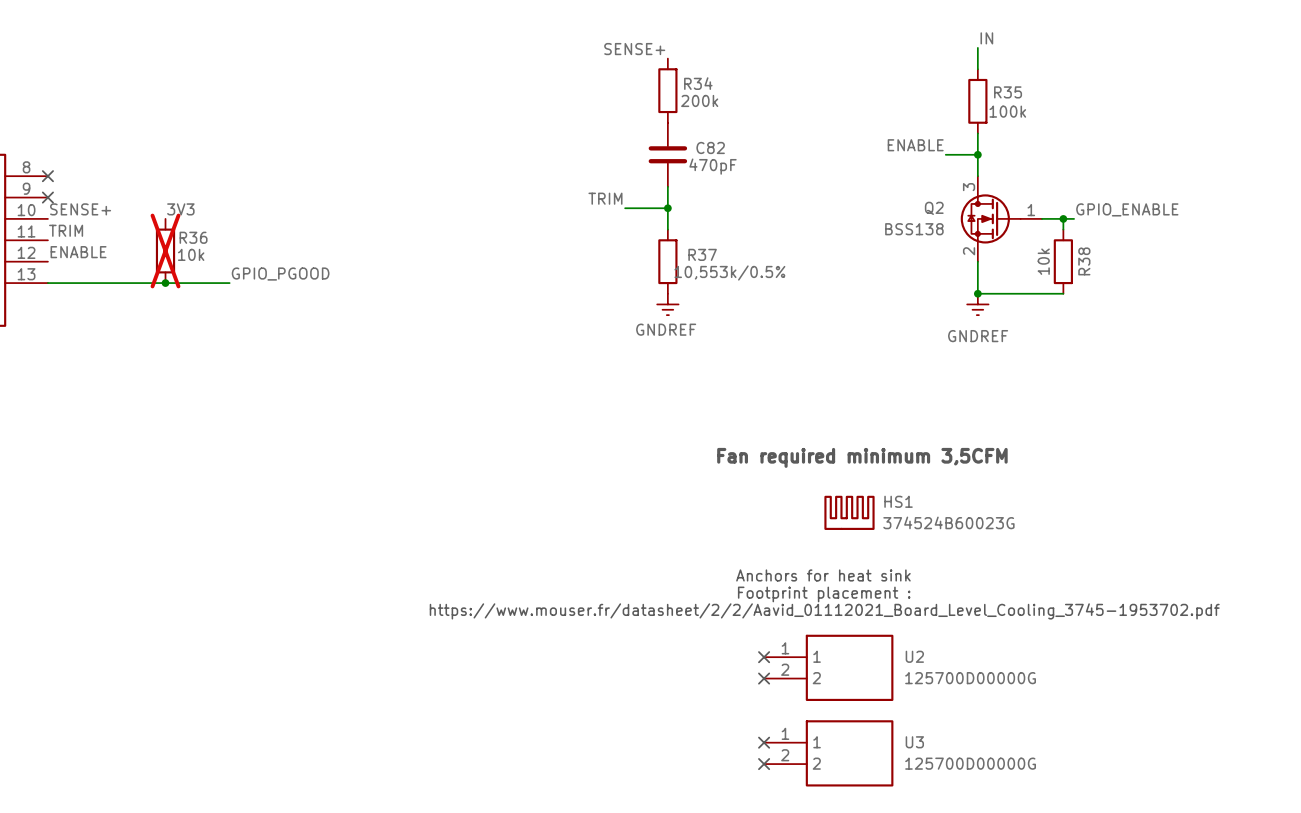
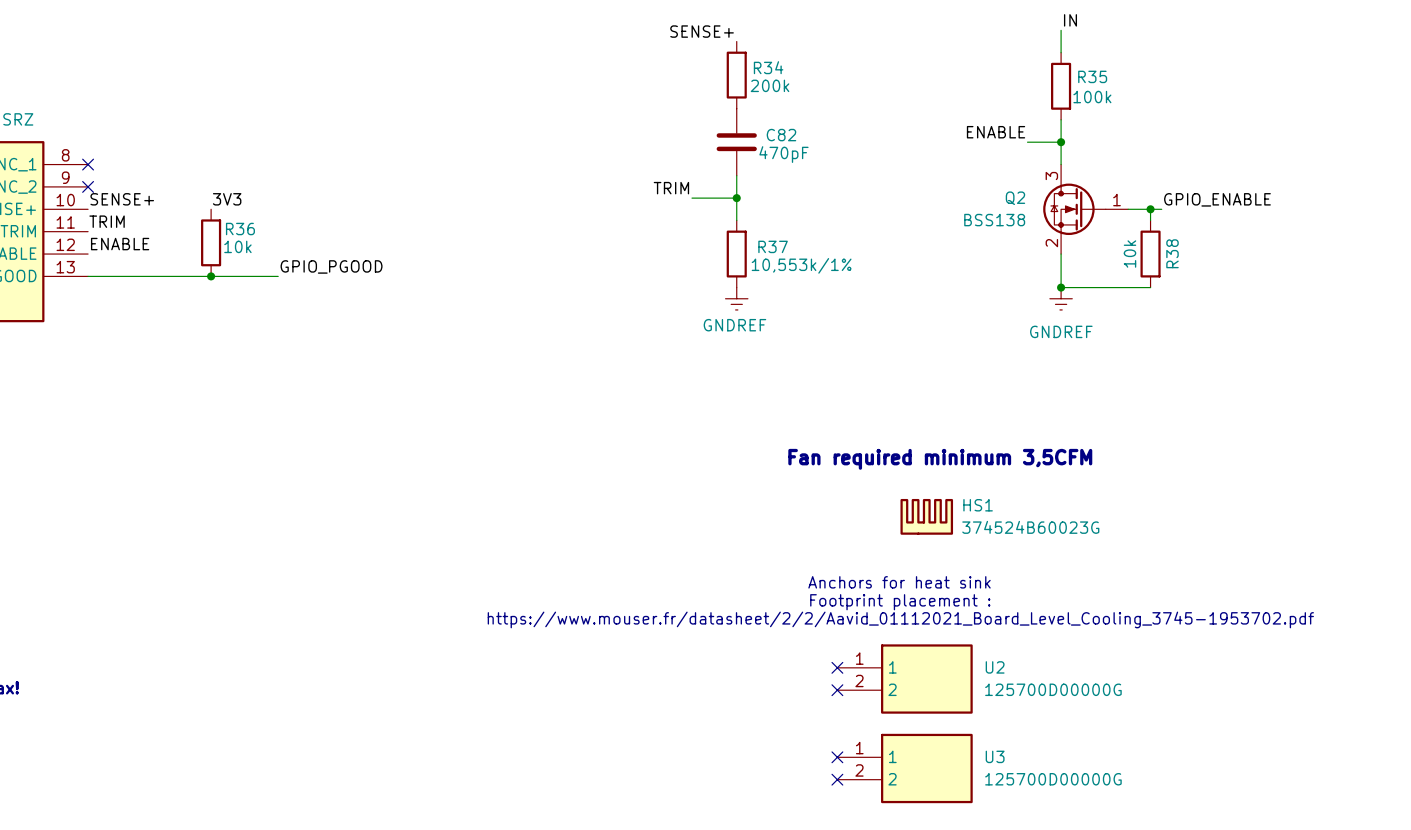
R36 do-not-place cross: (165, 250) -> none
R37 value: 10,553k/0.5% (729, 272) -> 10,553k/1% (801, 265)

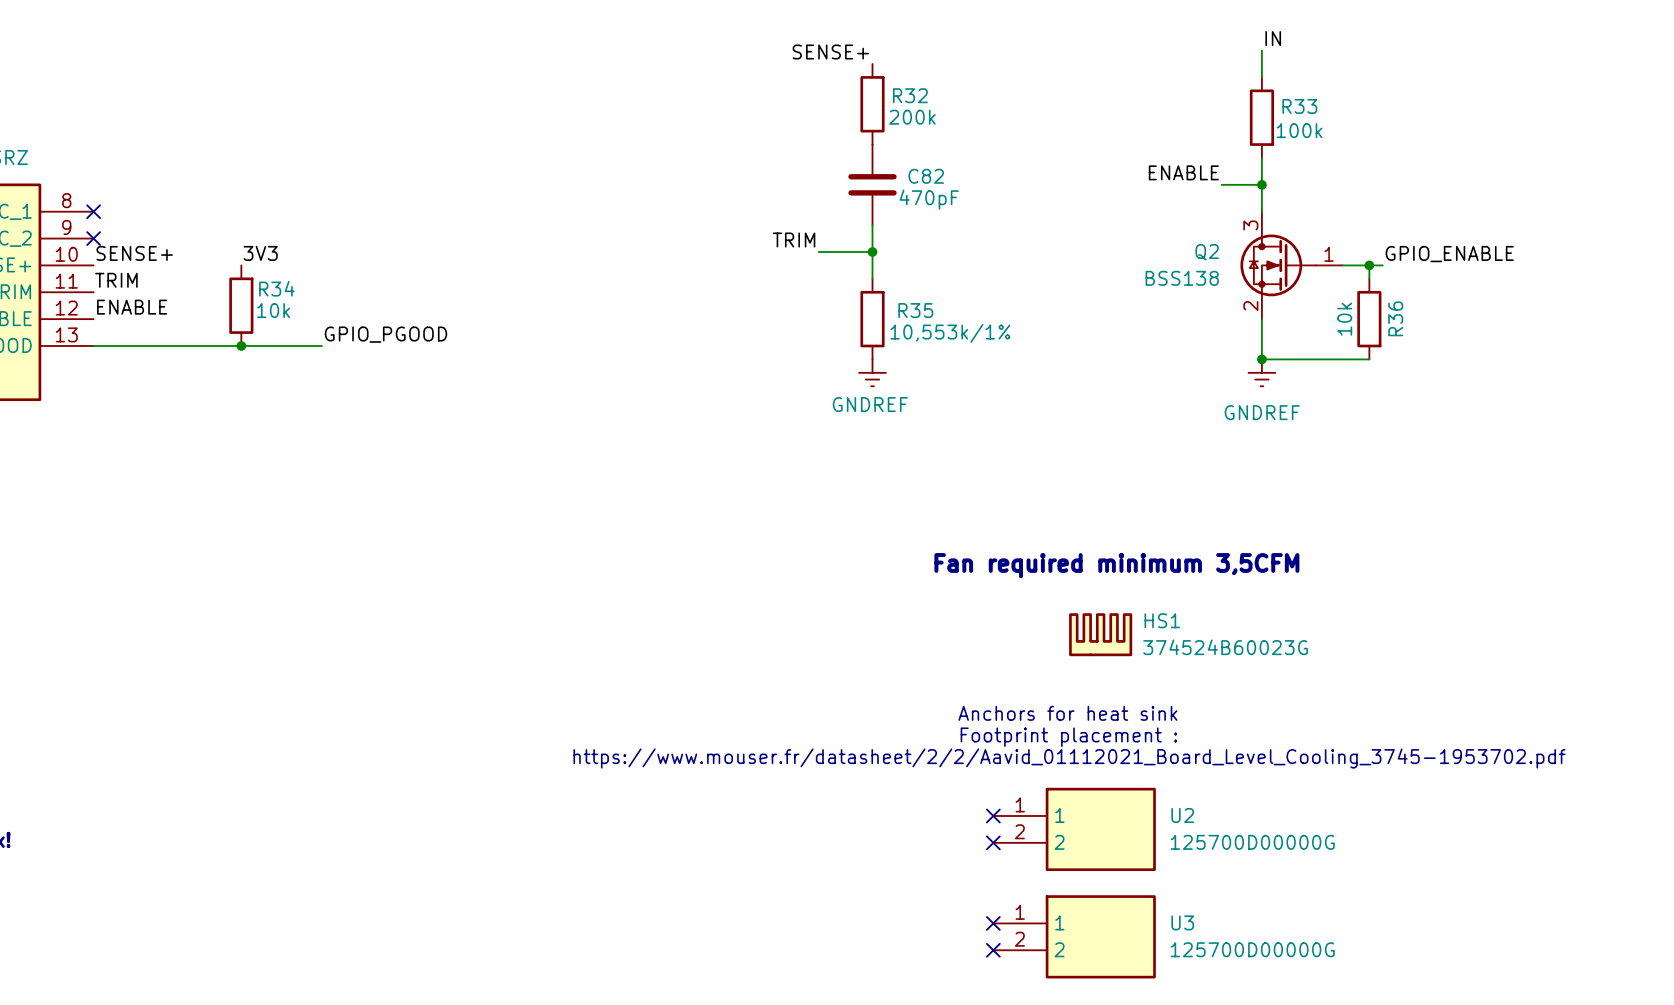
R34 name: R34 (768, 67) -> R32 (910, 95)
R35 name: R35 (1092, 76) -> R33 (1299, 106)
R36 name: R36 (240, 229) -> R34 (276, 288)
R37 name: R37 (773, 246) -> R35 (915, 310)
R38 name: R38 (1172, 253) -> R36 (1395, 318)

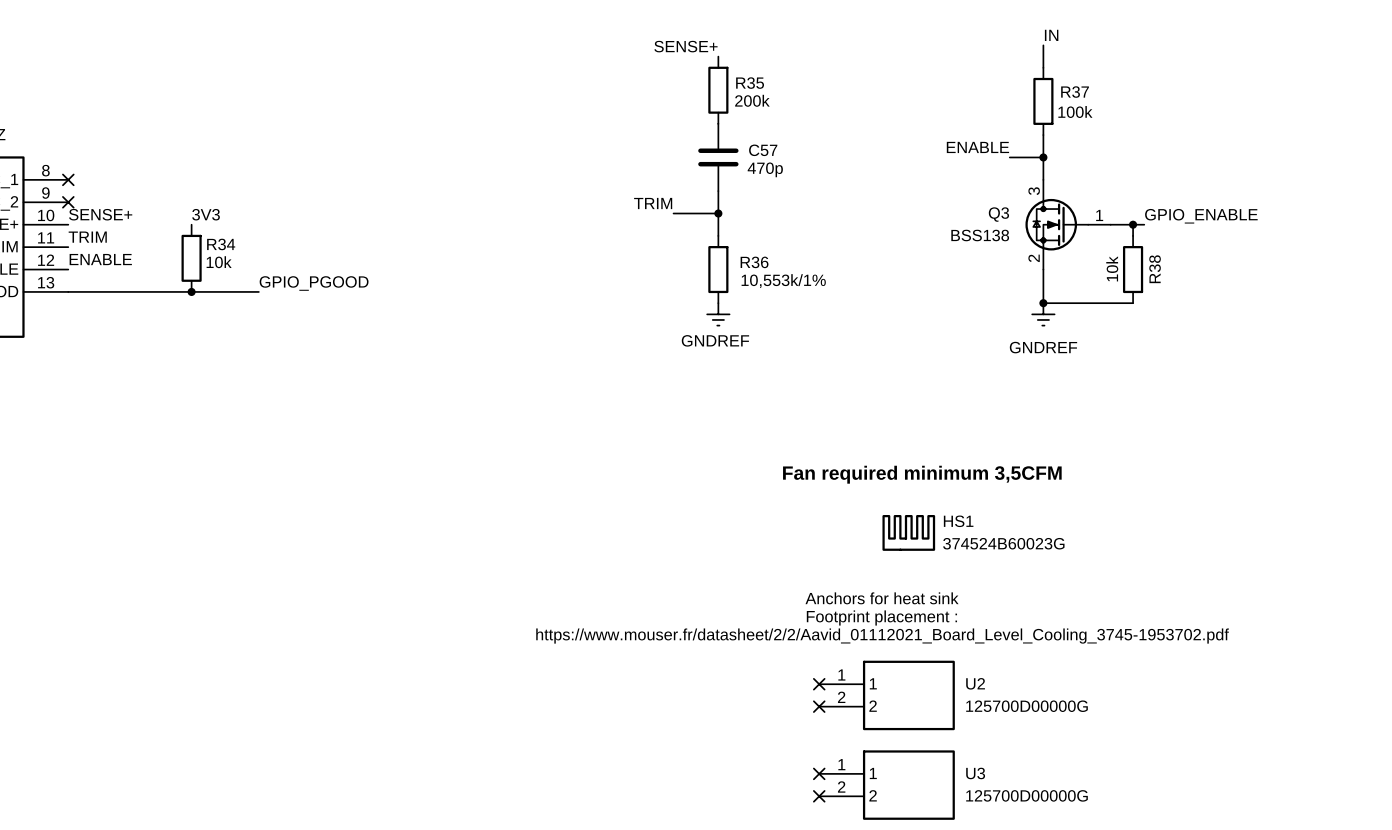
R32 name: R32 (910, 95) -> R35 (750, 83)
R33 name: R33 (1299, 106) -> R37 (1075, 92)
C82 name: C82 (926, 176) -> C57 (763, 150)
C82 value: 470pF (929, 199) -> 470p (765, 169)
Q2 name: Q2 (1207, 252) -> Q3 (998, 214)
R35 name: R35 (915, 310) -> R36 (754, 262)
R36 name: R36 (1395, 318) -> R38 (1155, 269)

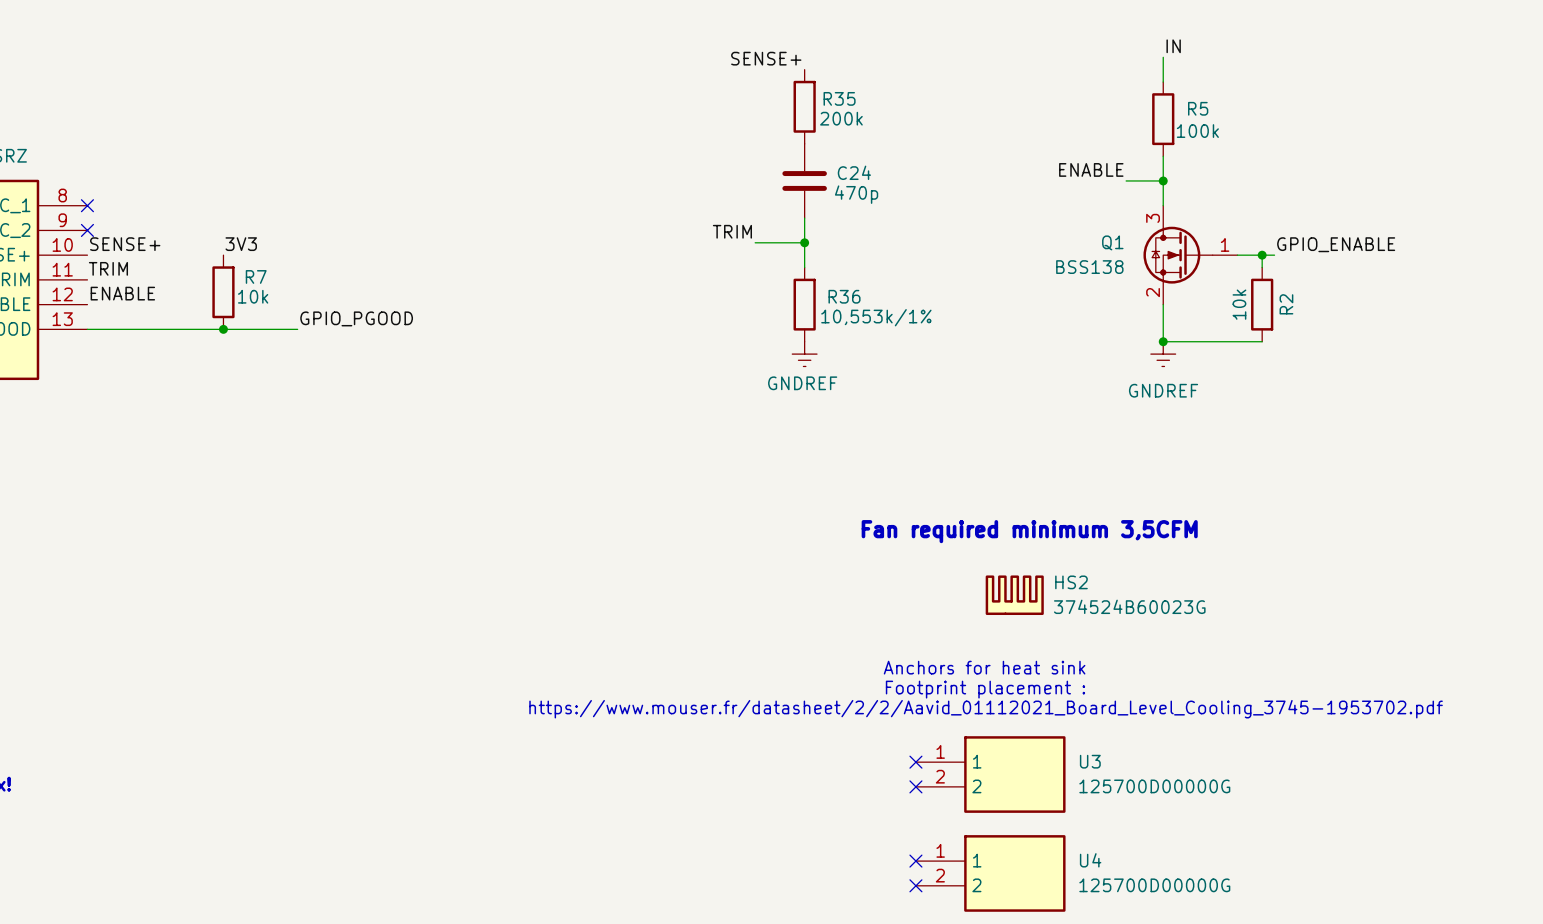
R37 name: R37 (1075, 92) -> R5 (1198, 108)
C57 name: C57 (763, 150) -> C24 (854, 172)
Q3 name: Q3 (998, 214) -> Q1 (1112, 242)
R34 name: R34 (221, 244) -> R7 (256, 276)
R38 name: R38 (1155, 269) -> R2 (1286, 304)
HS1 name: HS1 (958, 521) -> HS2 (1071, 582)
U2 name: U2 (975, 683) -> U3 (1090, 761)
U3 name: U3 (975, 773) -> U4 (1090, 860)

